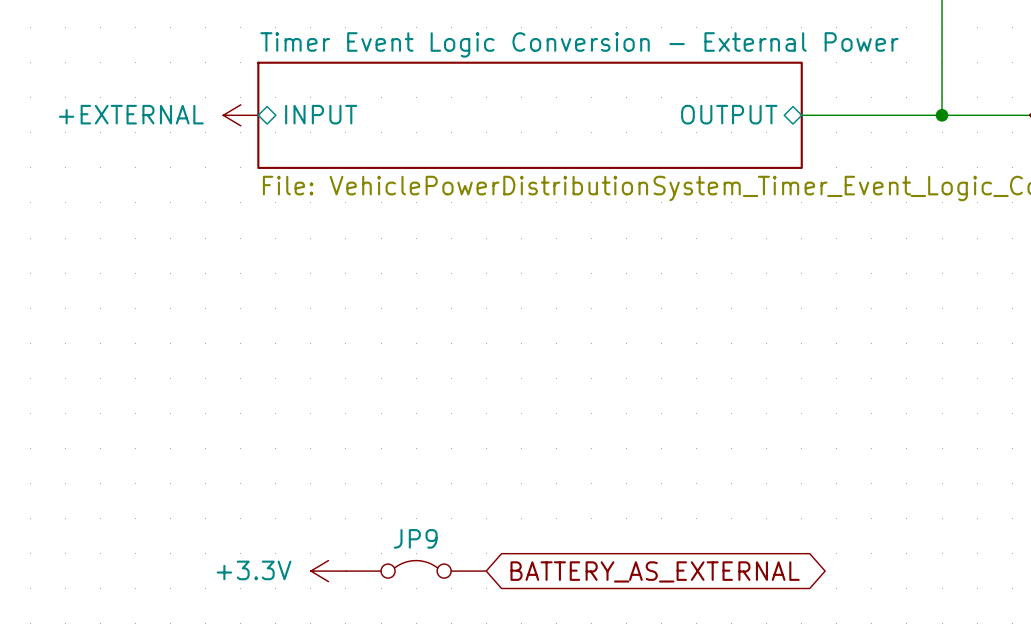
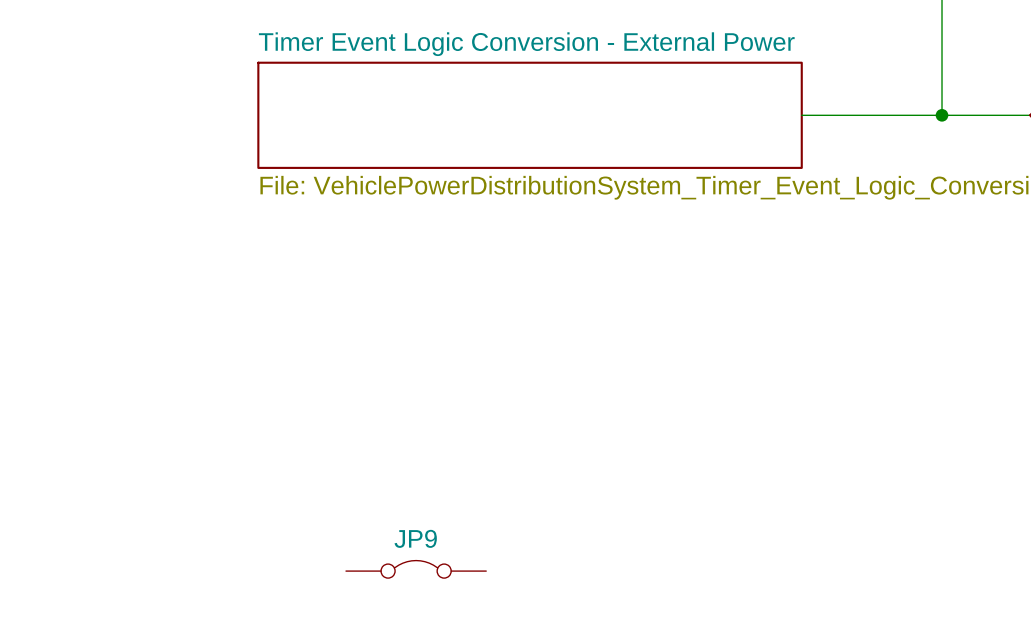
sheet pin: INPUT (321, 114) -> none
sheet pin: OUTPUT (729, 114) -> none
power symbol: +EXTERNAL (240, 115) -> none
power symbol: +3.3V (328, 571) -> none
global label: BATTERY_AS_EXTERNAL (655, 571) -> none

